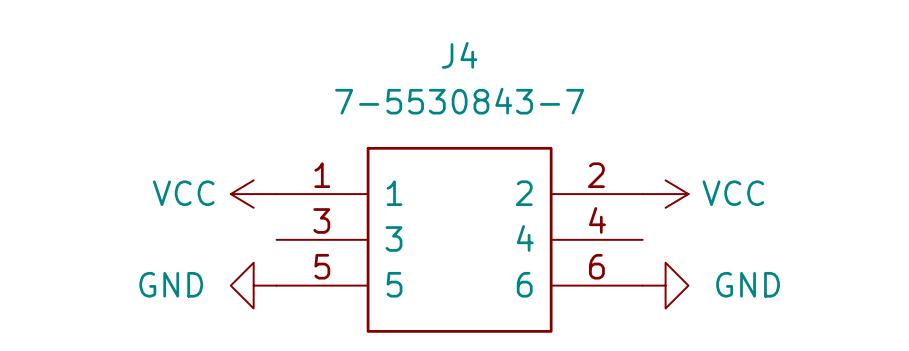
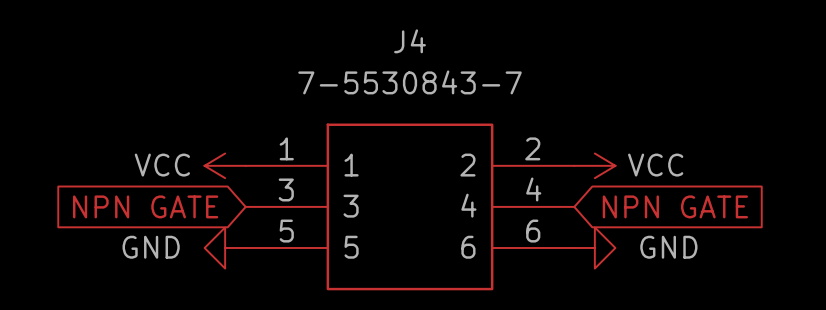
global label: none -> NPN GATE (145, 206)
global label: none -> NPN GATE (675, 206)

